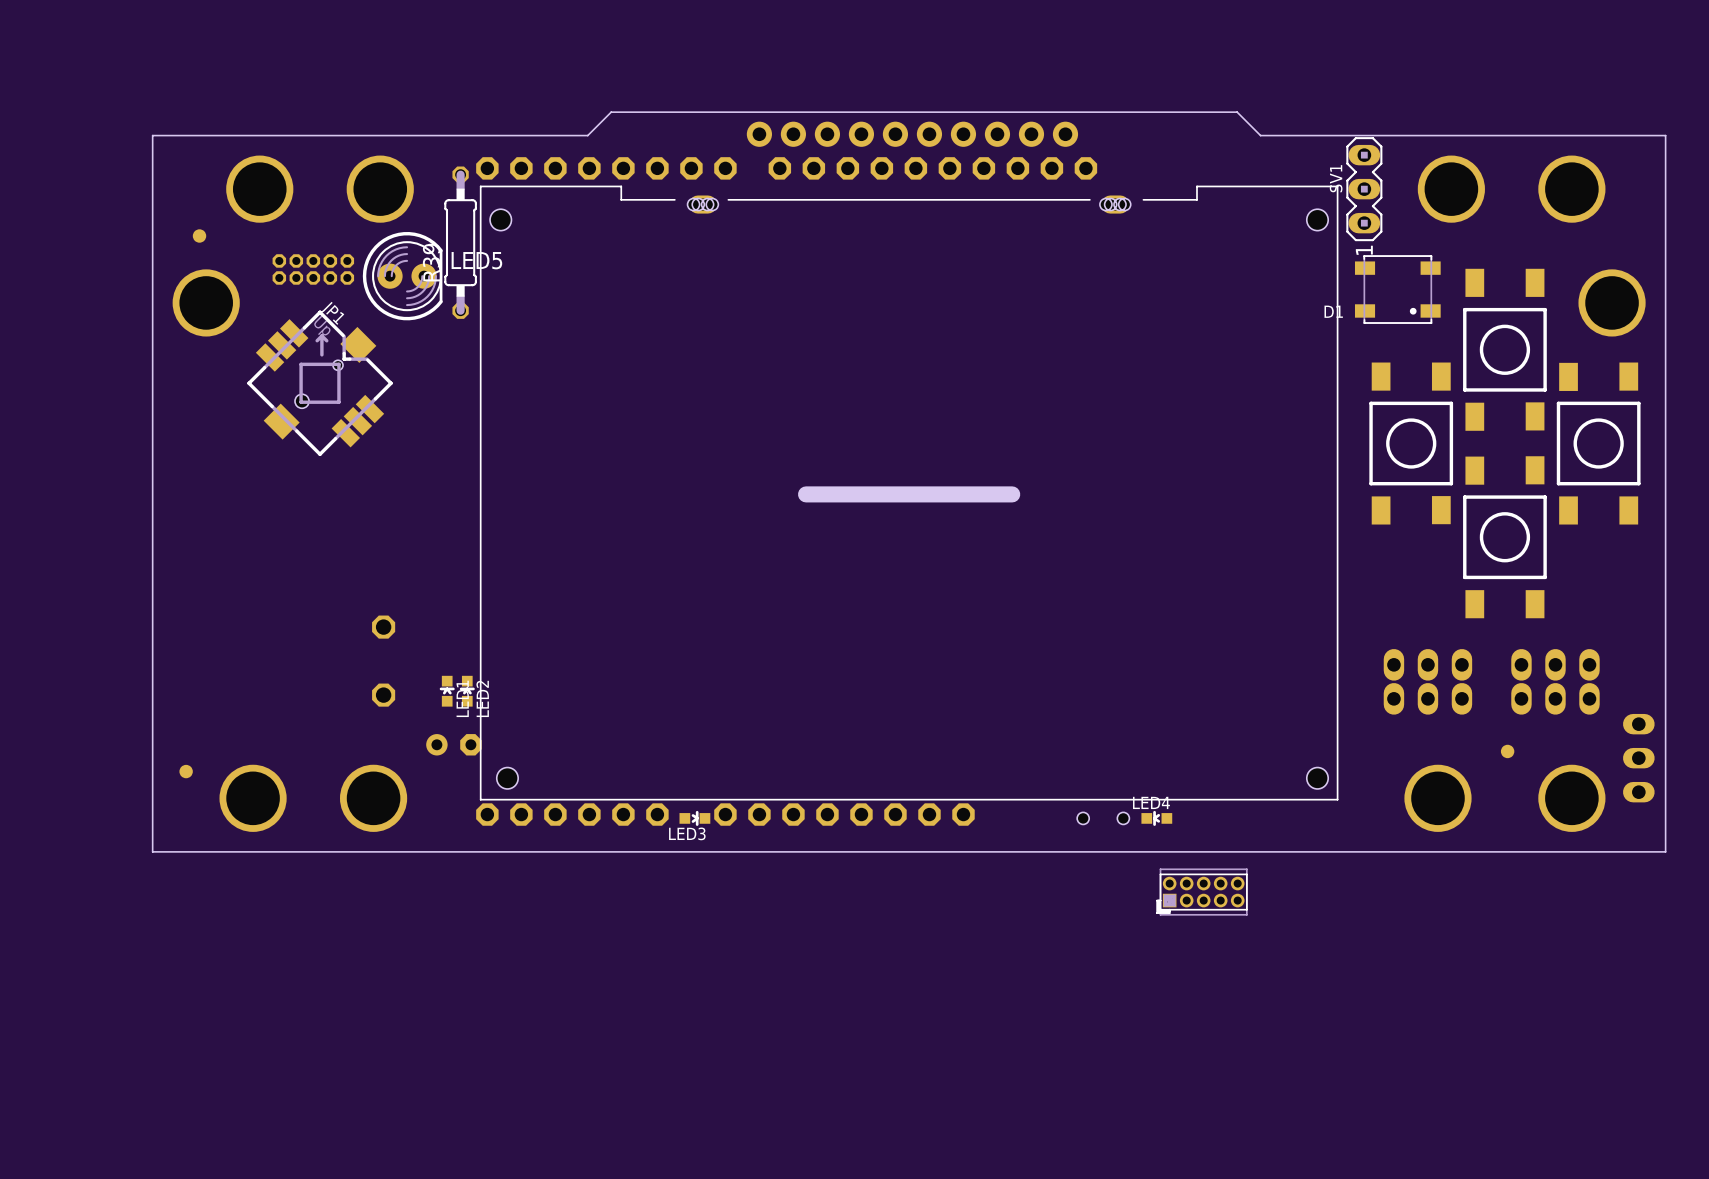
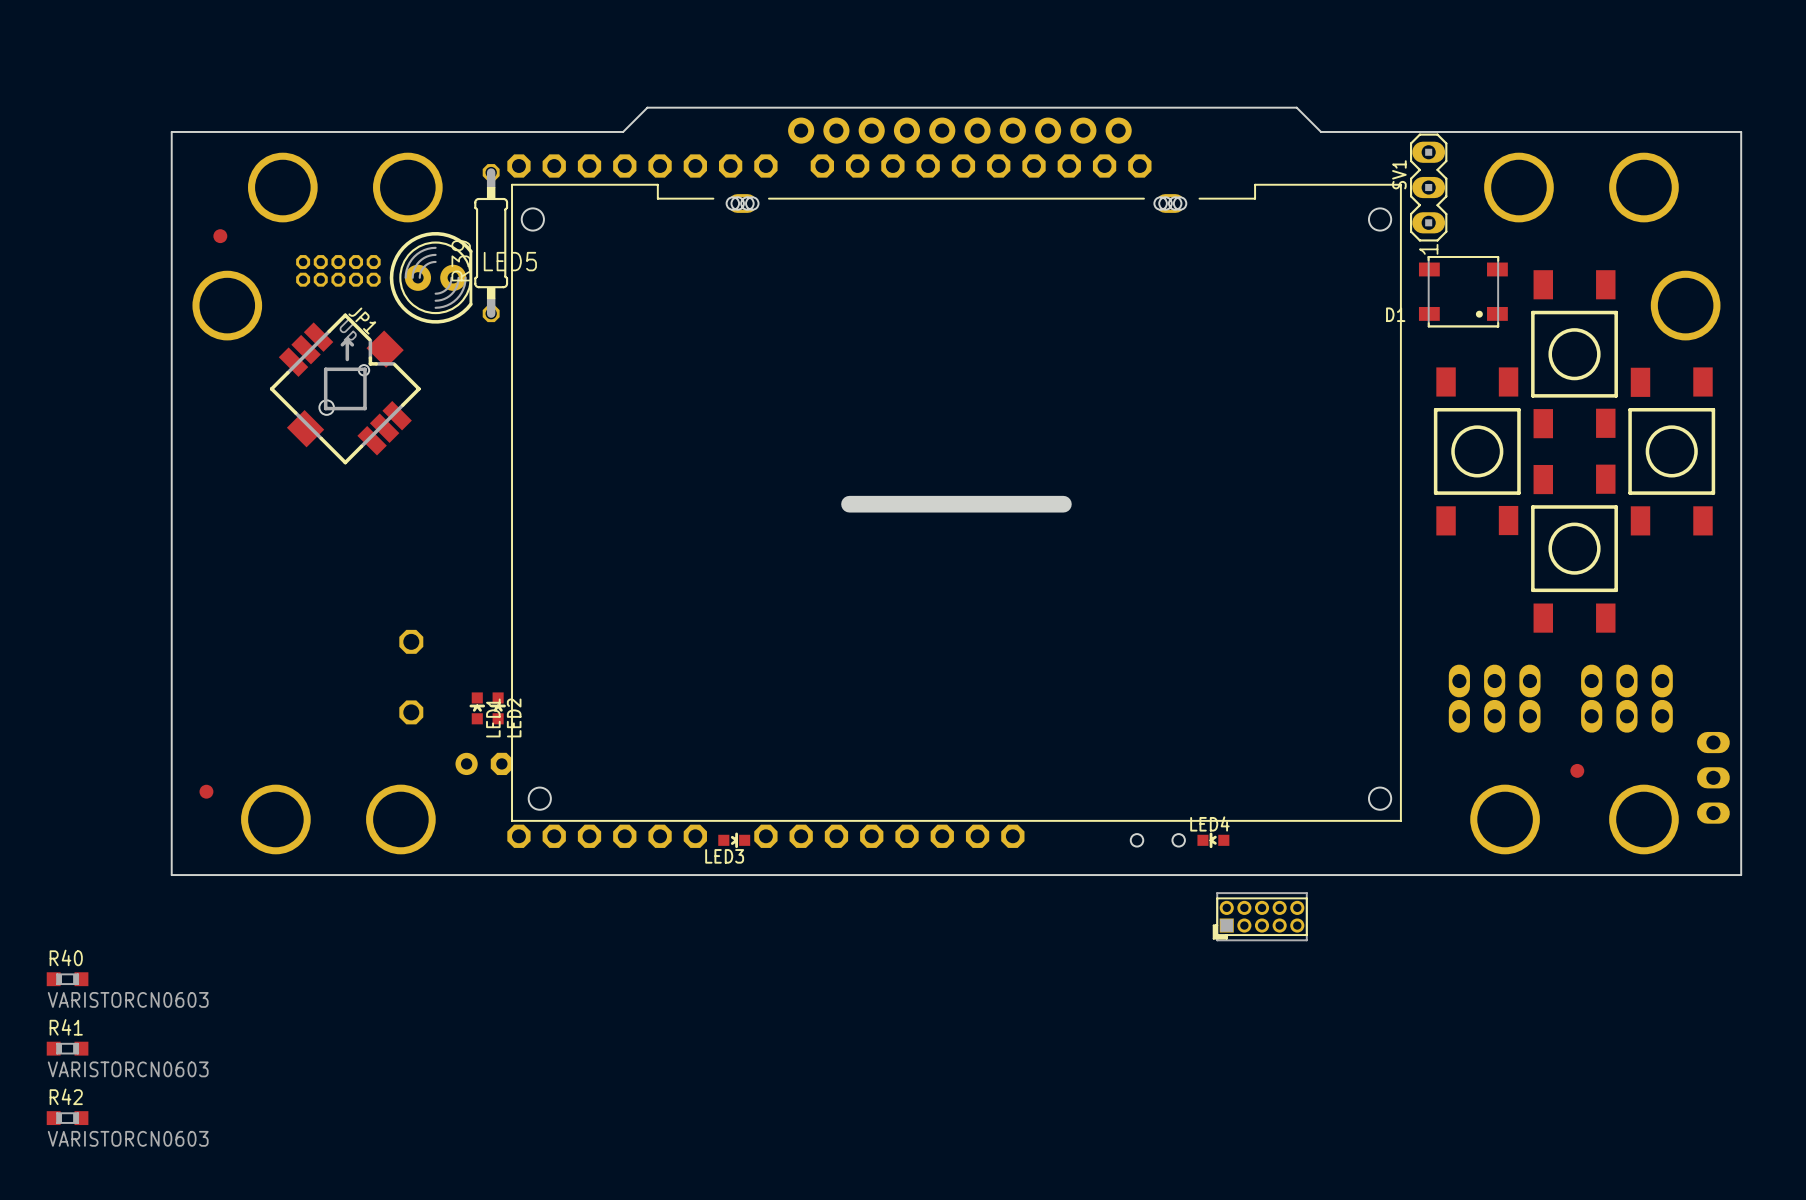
R40: none -> VARISTORCN0603 (67, 979)
R41: none -> VARISTORCN0603 (67, 1048)
R42: none -> VARISTORCN0603 (67, 1118)

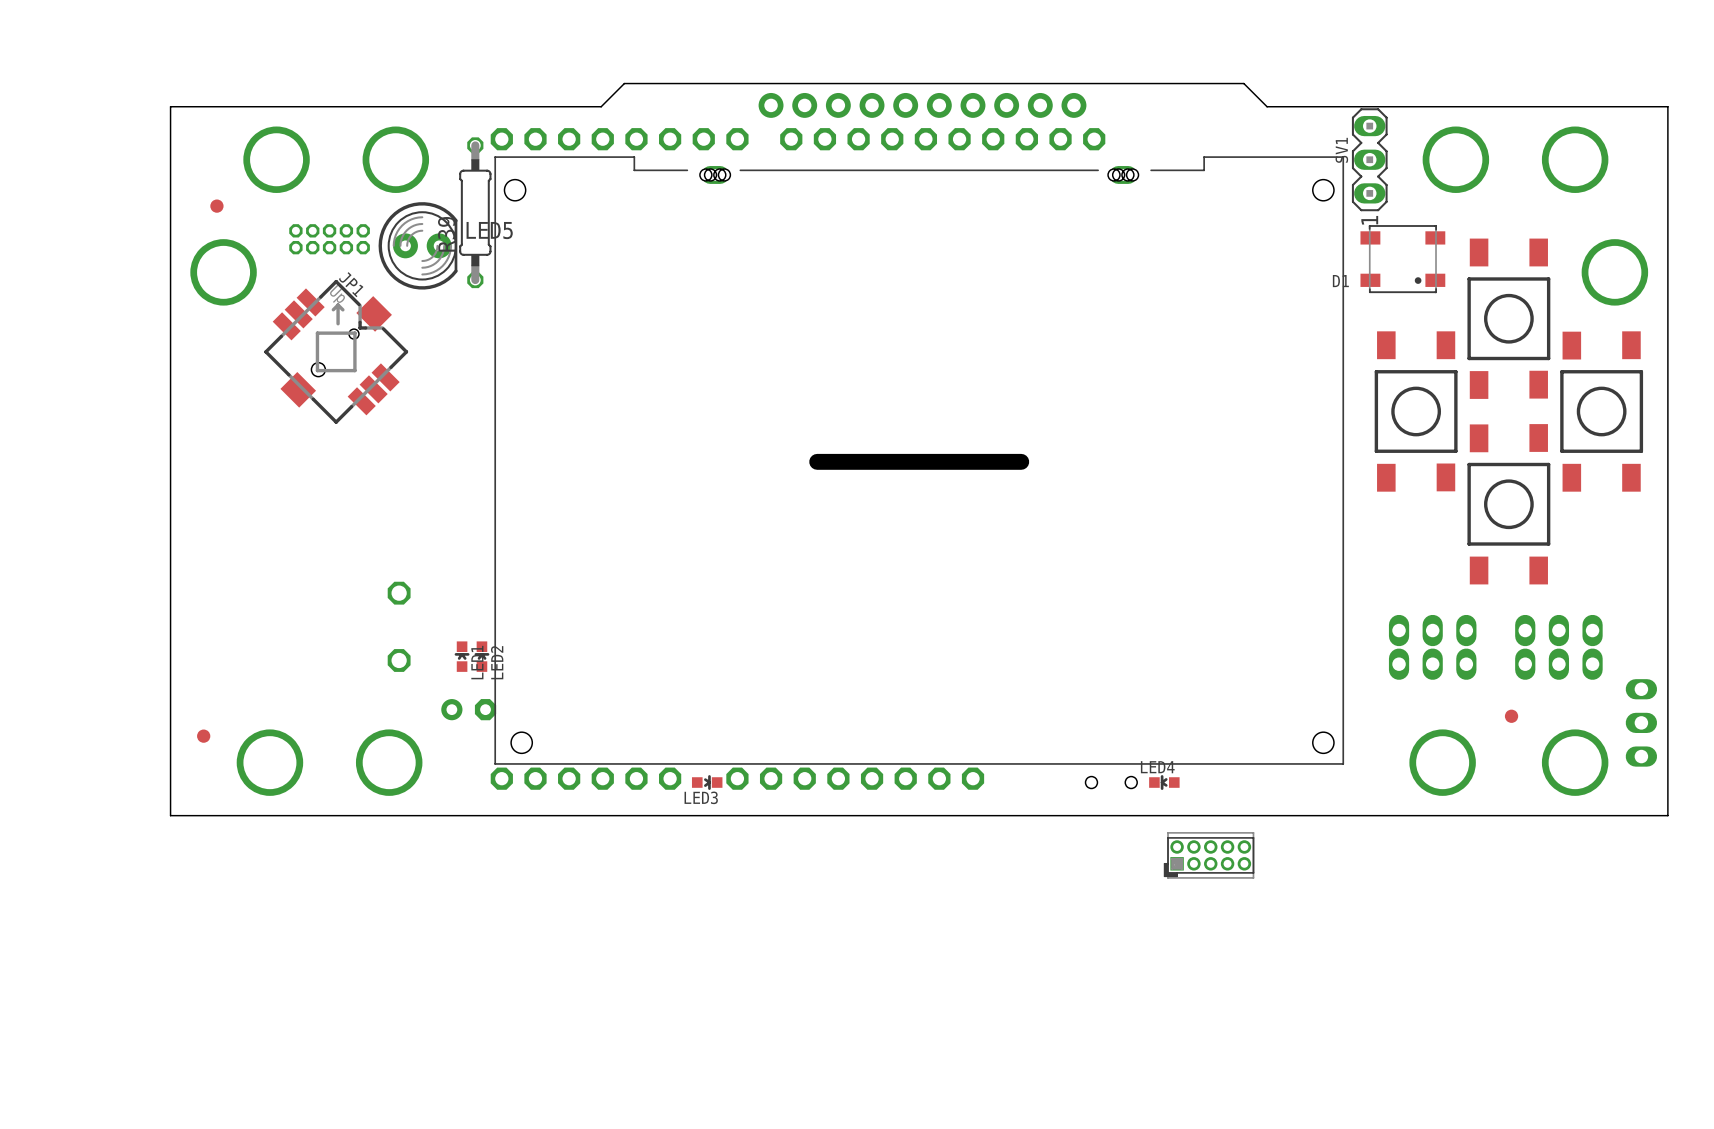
R40: VARISTORCN0603 (67, 979) -> none
R41: VARISTORCN0603 (67, 1048) -> none
R42: VARISTORCN0603 (67, 1118) -> none

